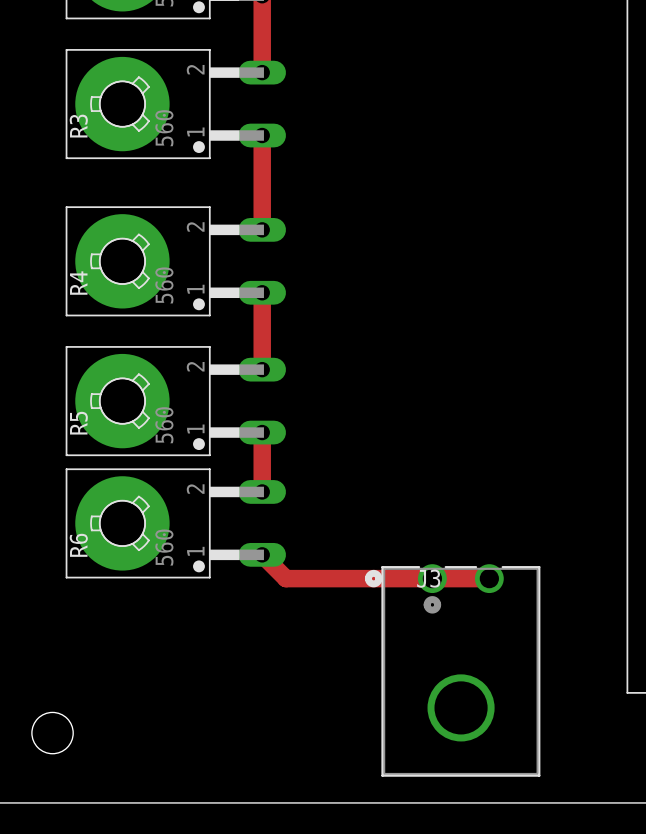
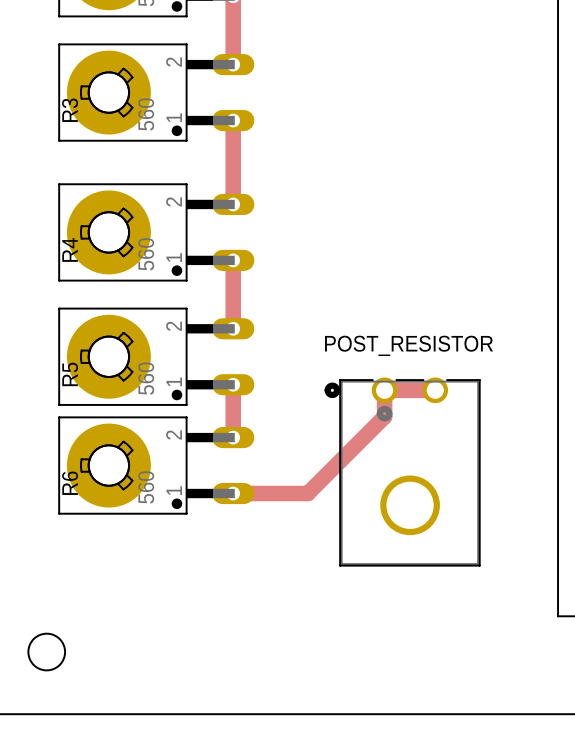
POST_RESISTOR: none -> (402, 472)
track: (262, 554) (285, 578) (489, 578) -> (233, 493) (307, 493) (384, 416) (384, 390) (435, 390)
J3: (452, 670) -> none

